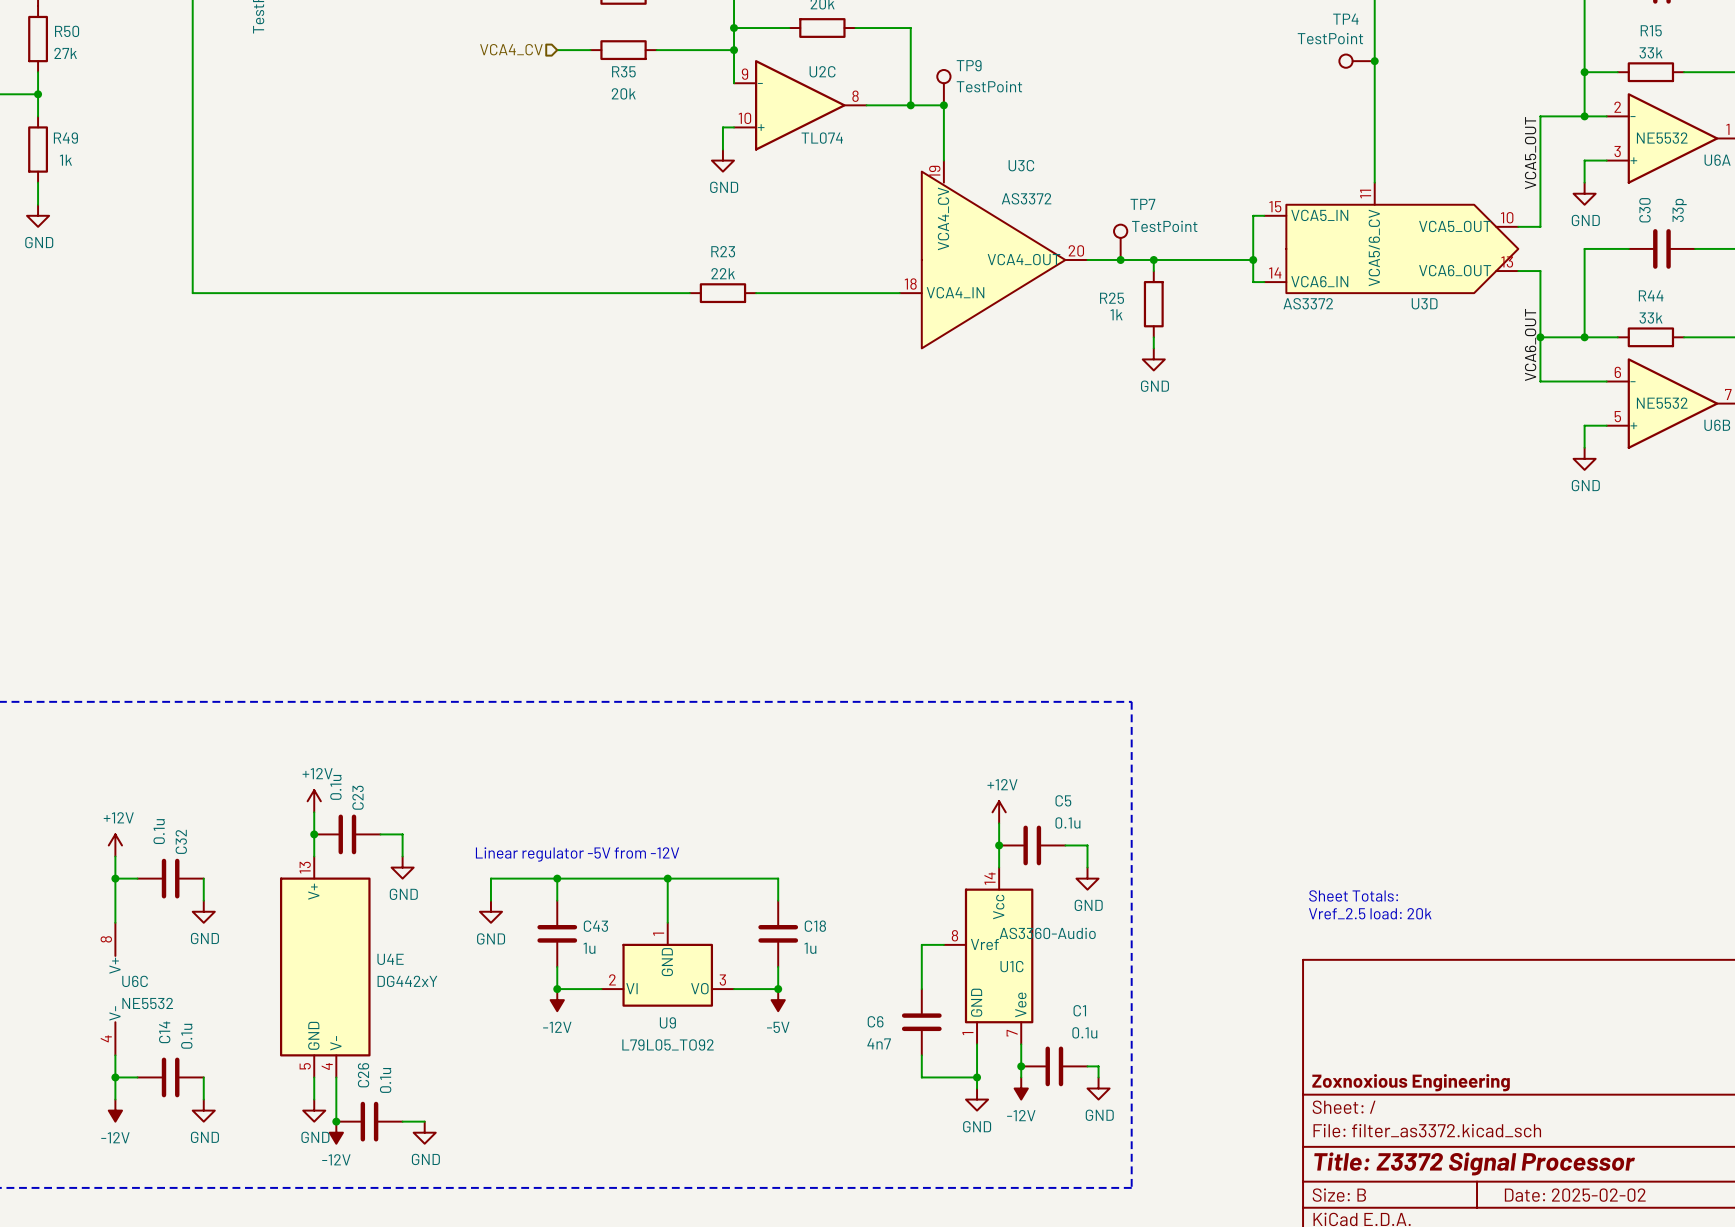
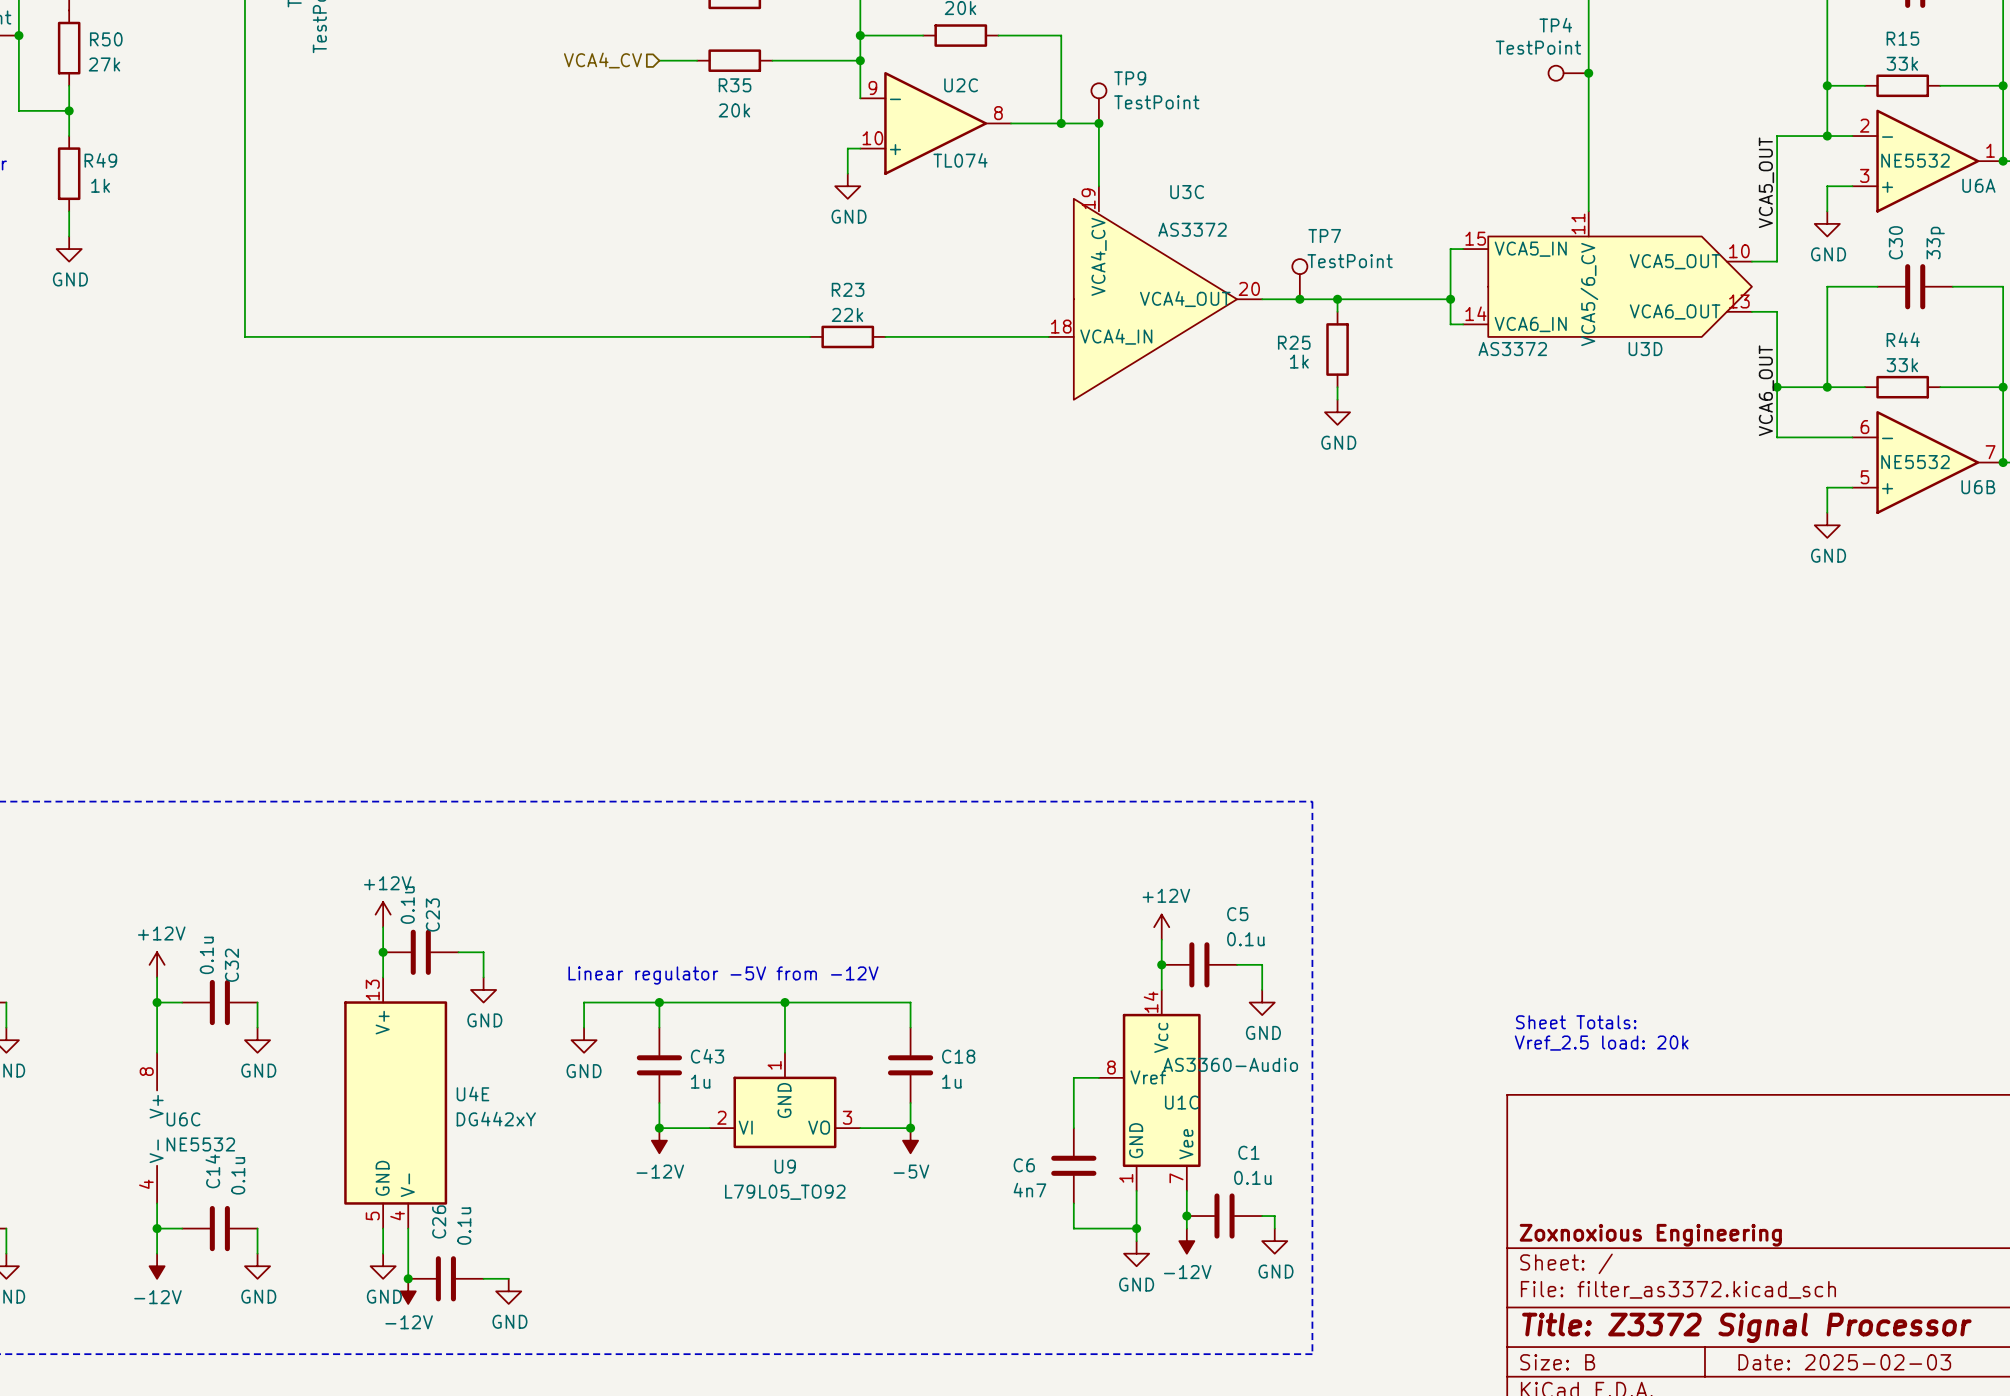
title block: Date: 2025-02-02 (1575, 1195) -> Date: 2025-02-03 (1844, 1362)

